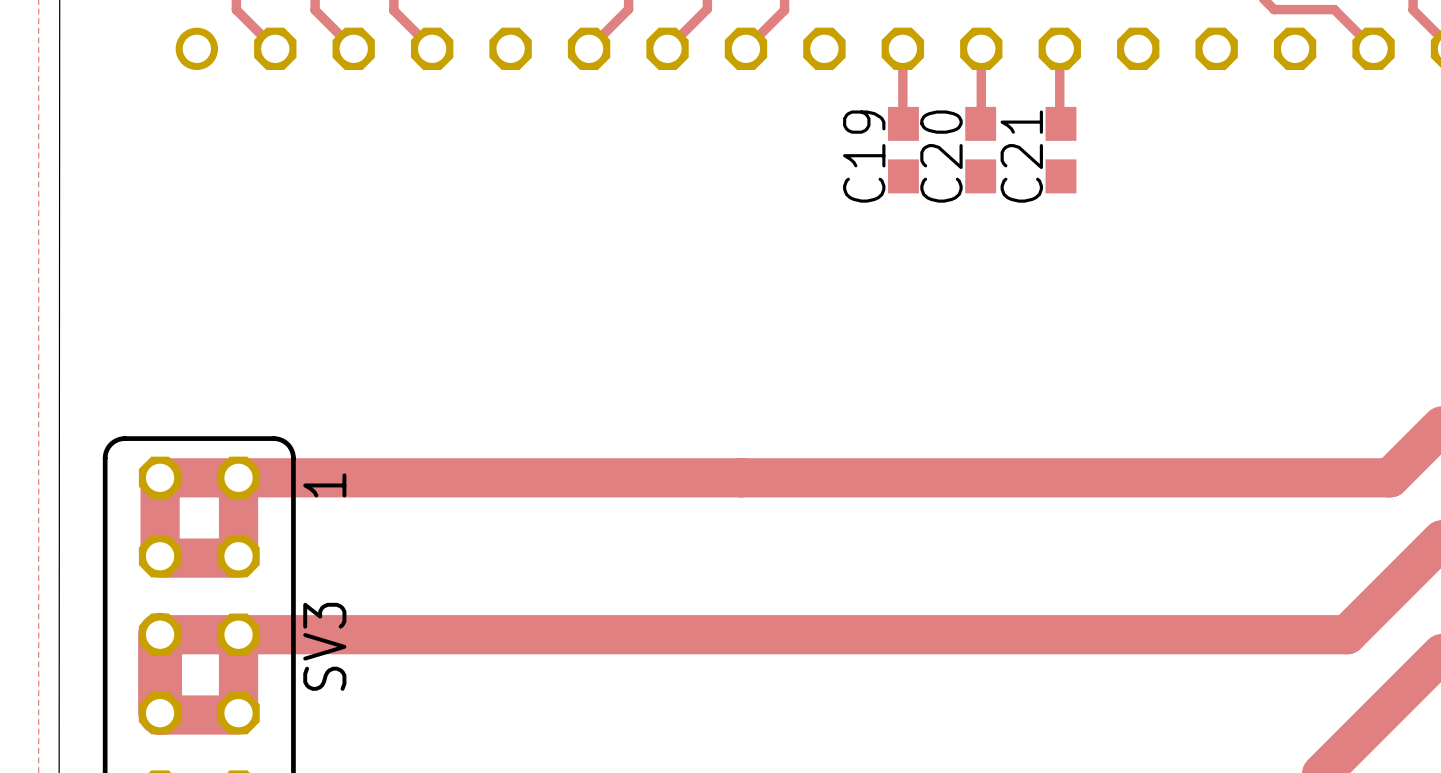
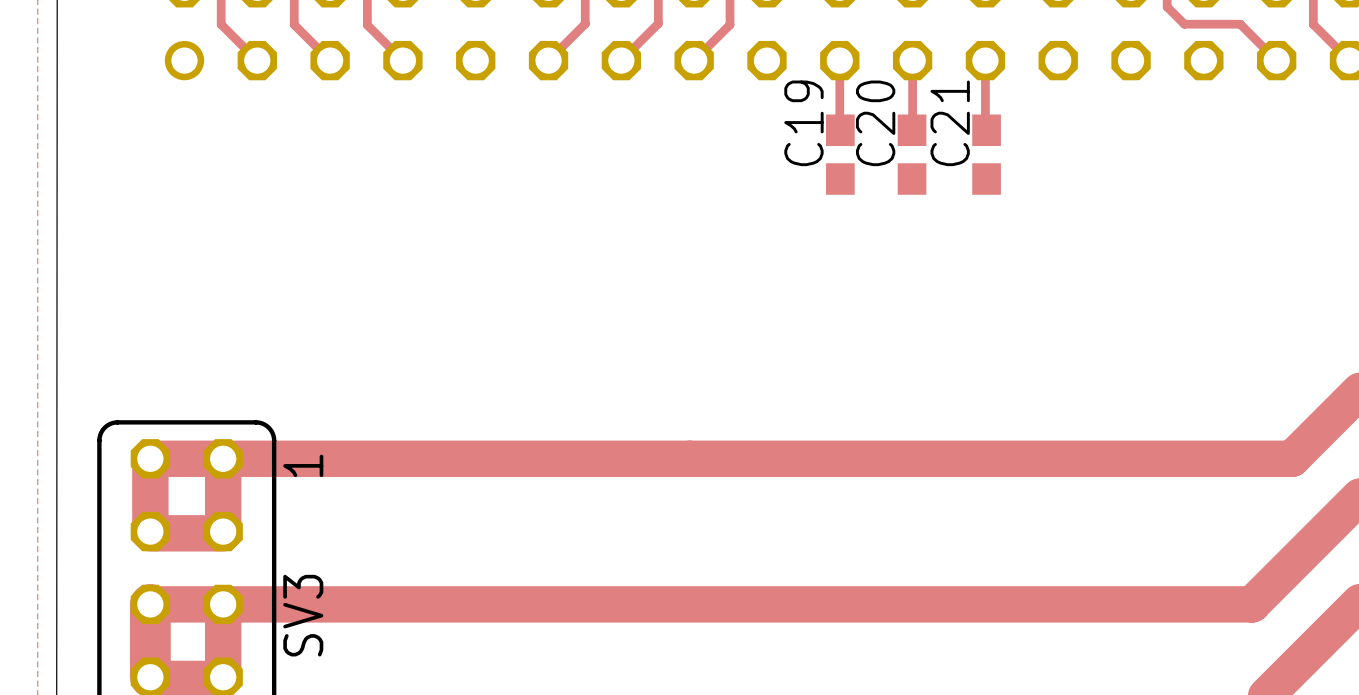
C19 name position: C19 (864, 156) -> C19 (803, 123)
C20 name position: C20 (941, 156) -> C20 (875, 123)
C21 name position: C21 (1021, 156) -> C21 (950, 123)

